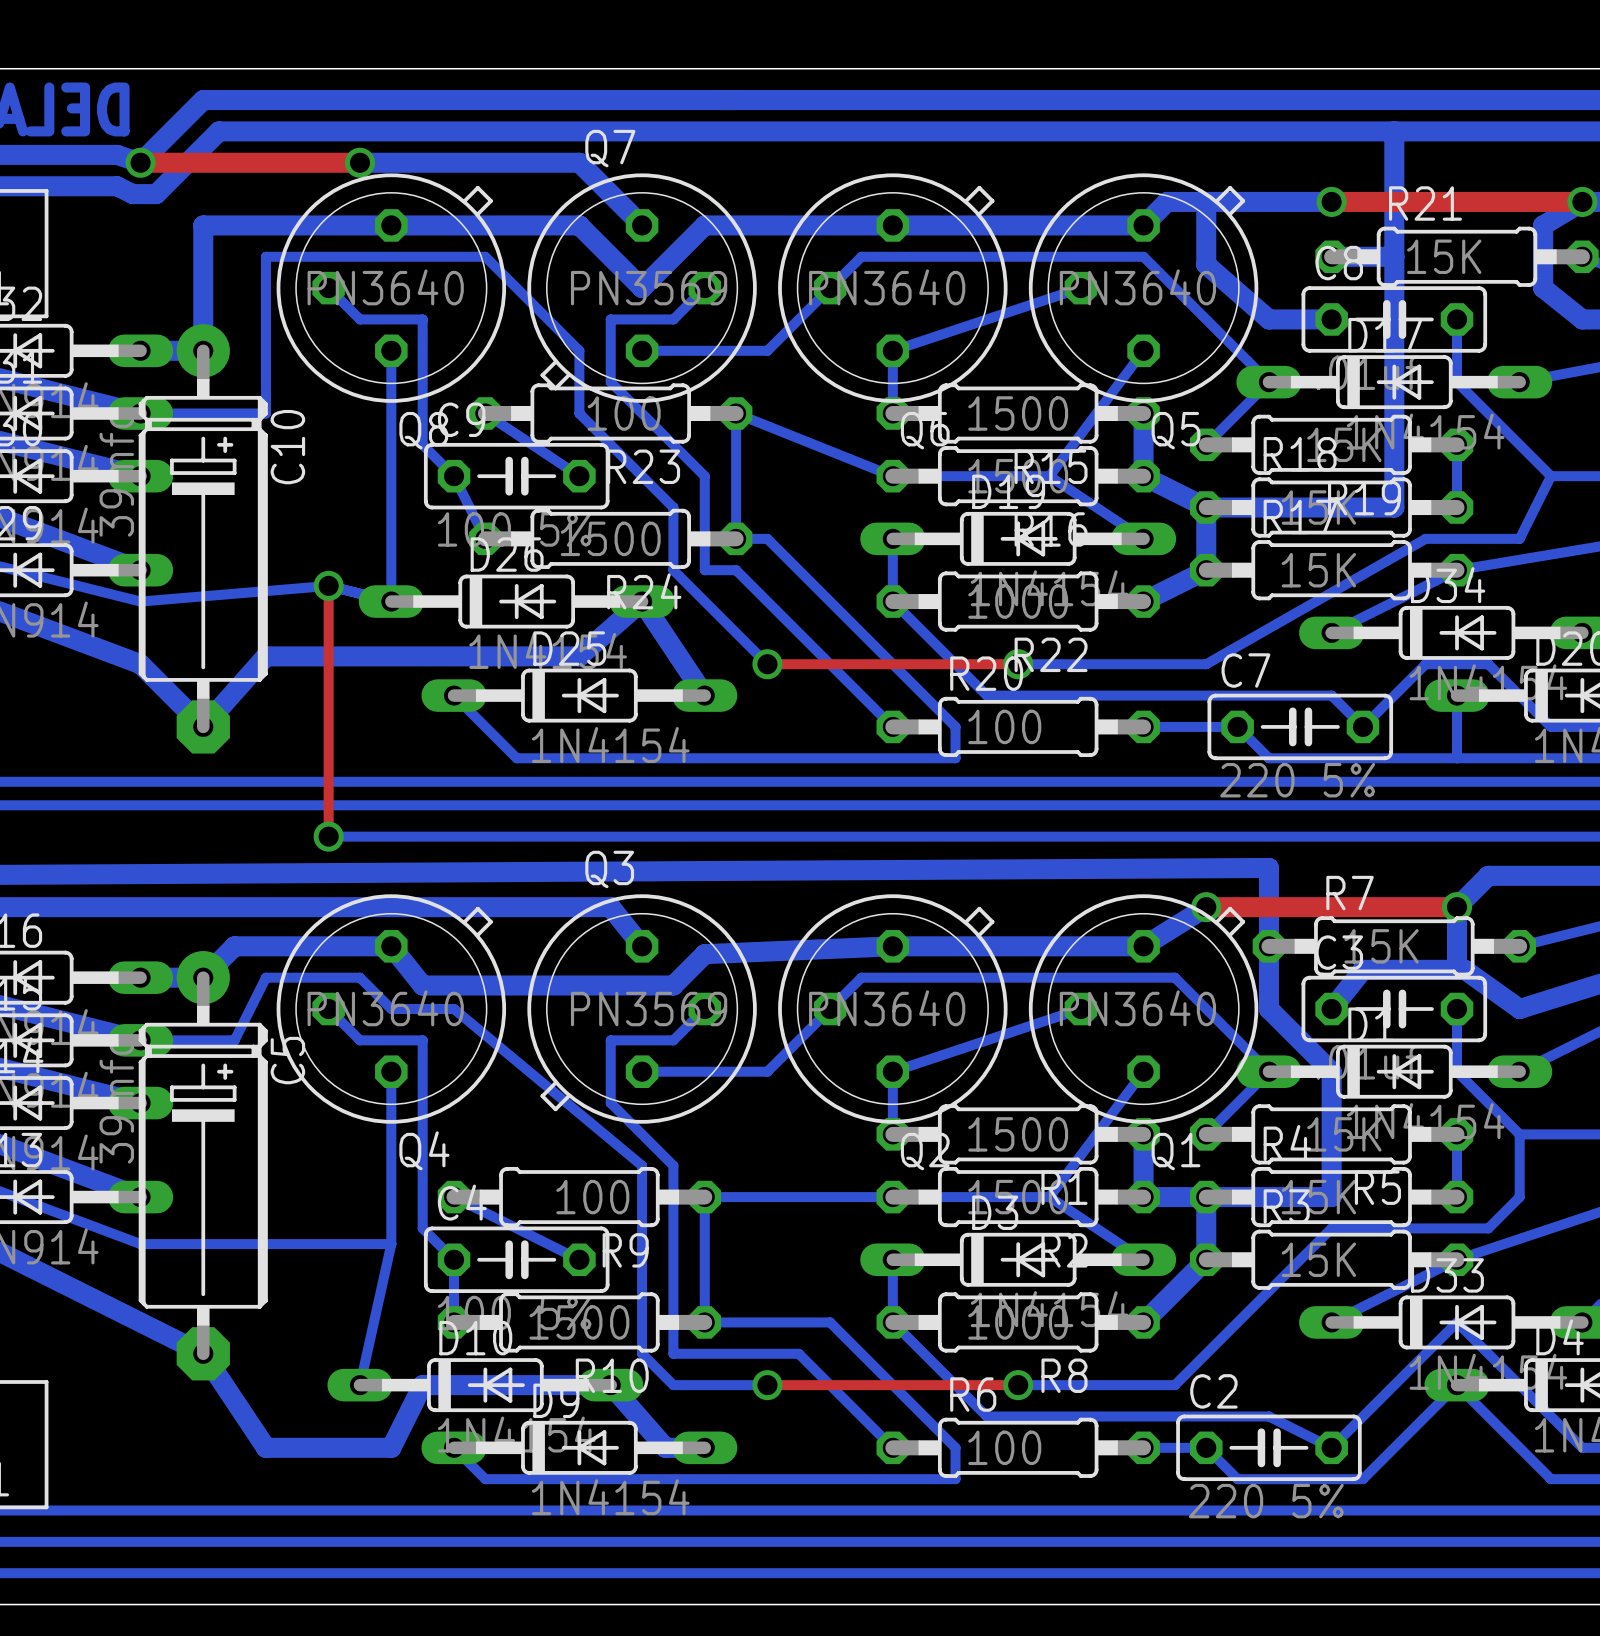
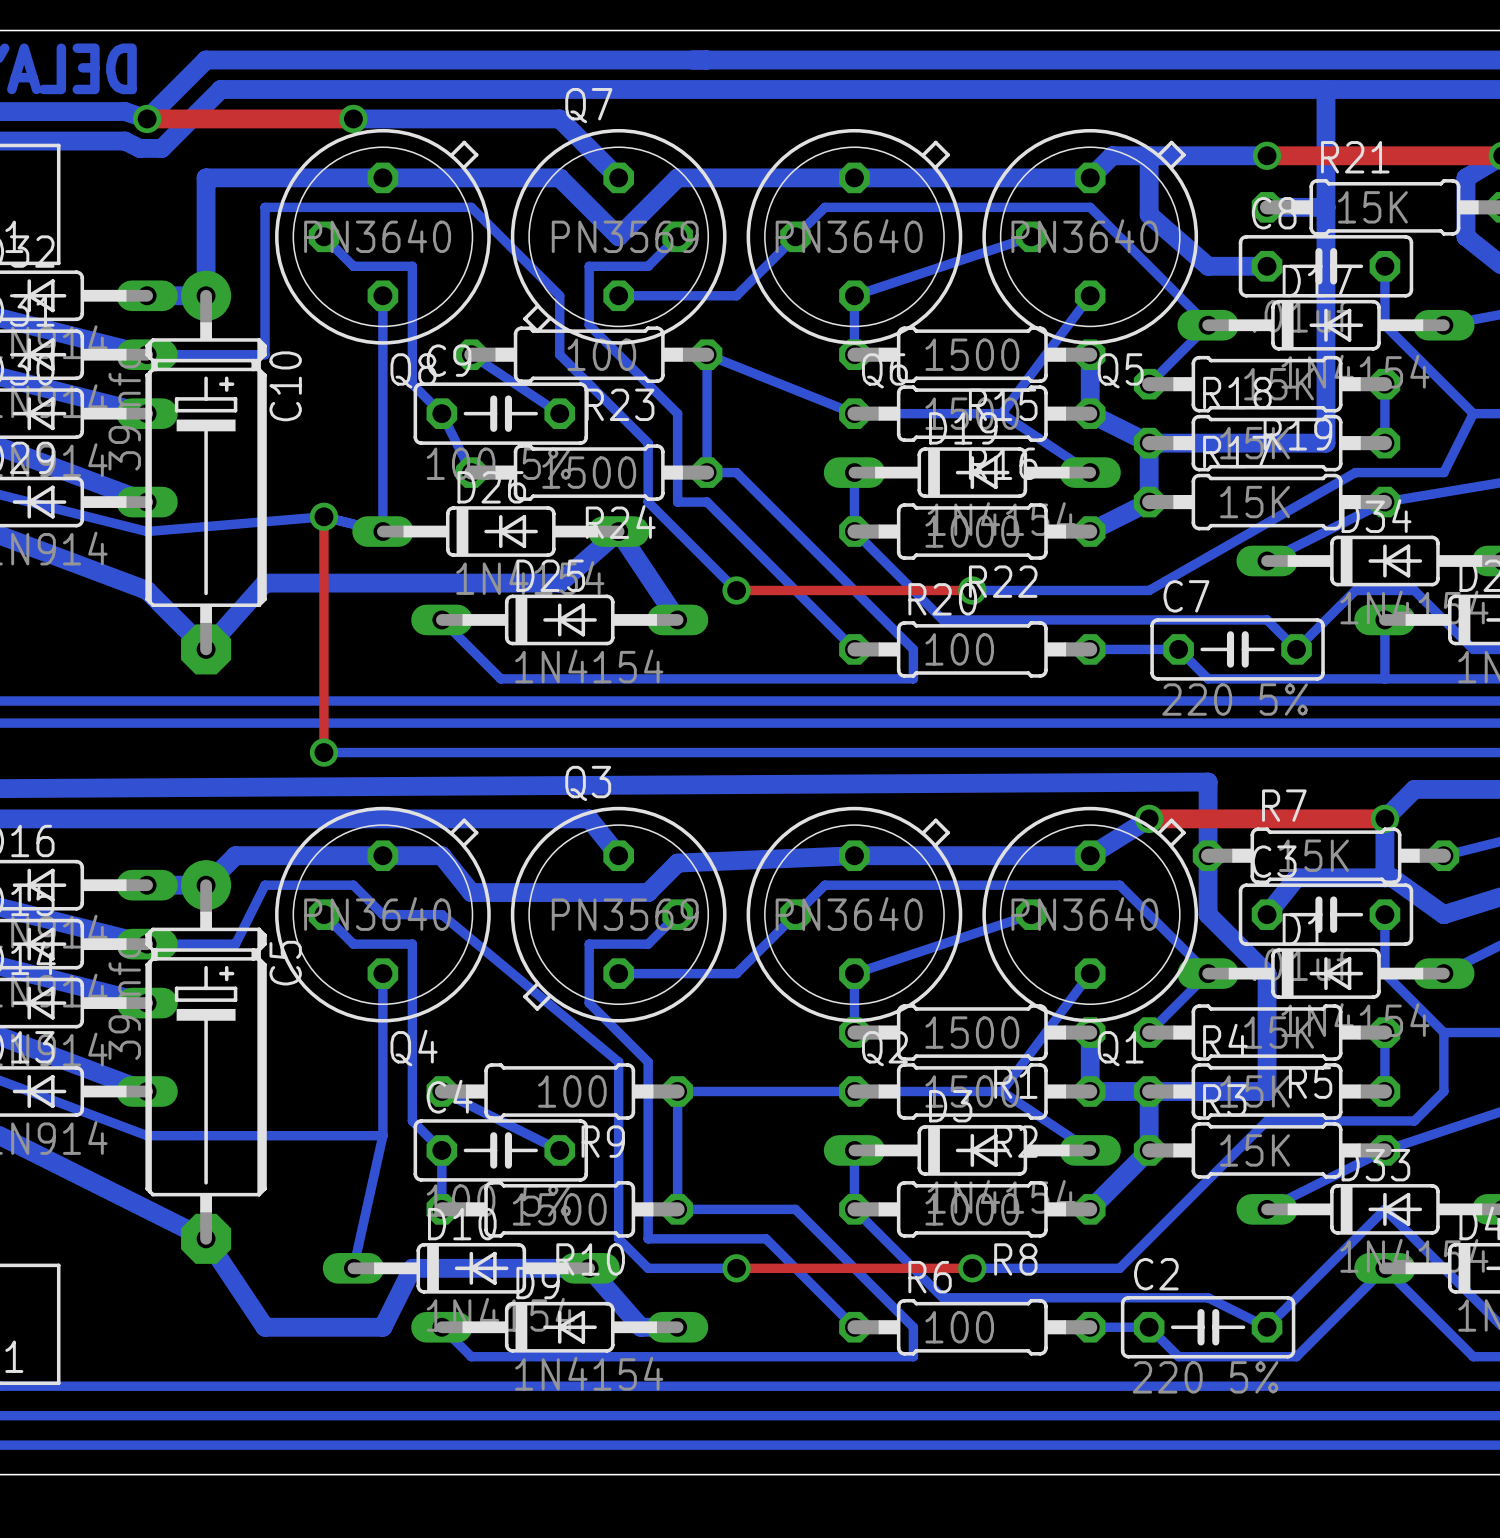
bottom track: (391, 946) (422, 985) (485, 985) -> (382, 855) (441, 855) (471, 892)

